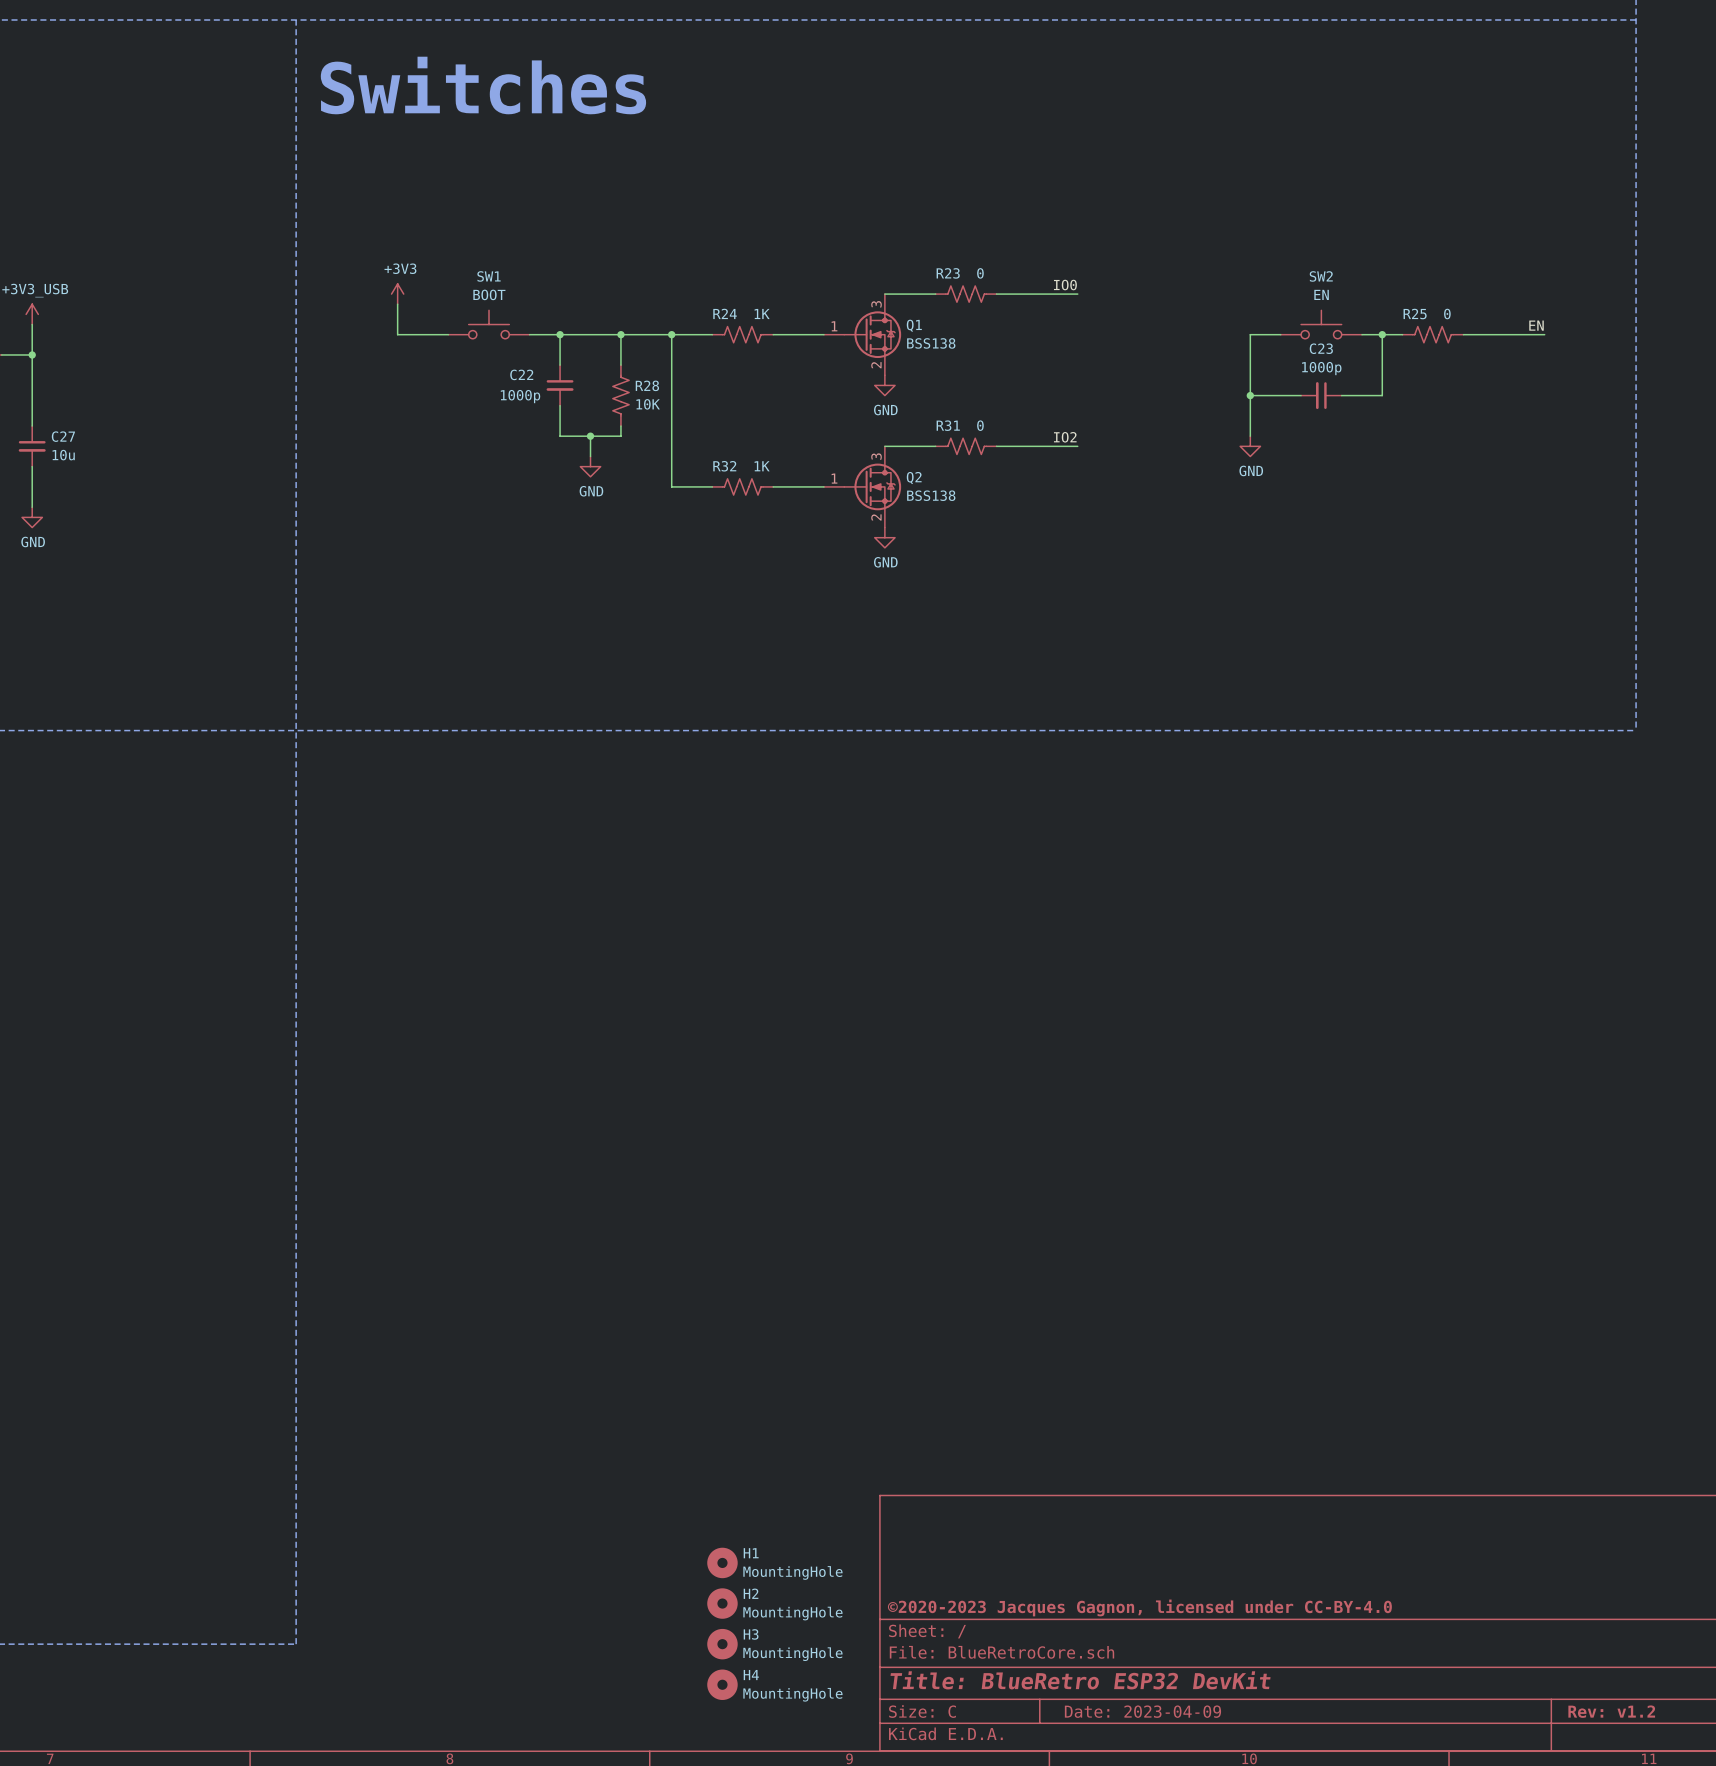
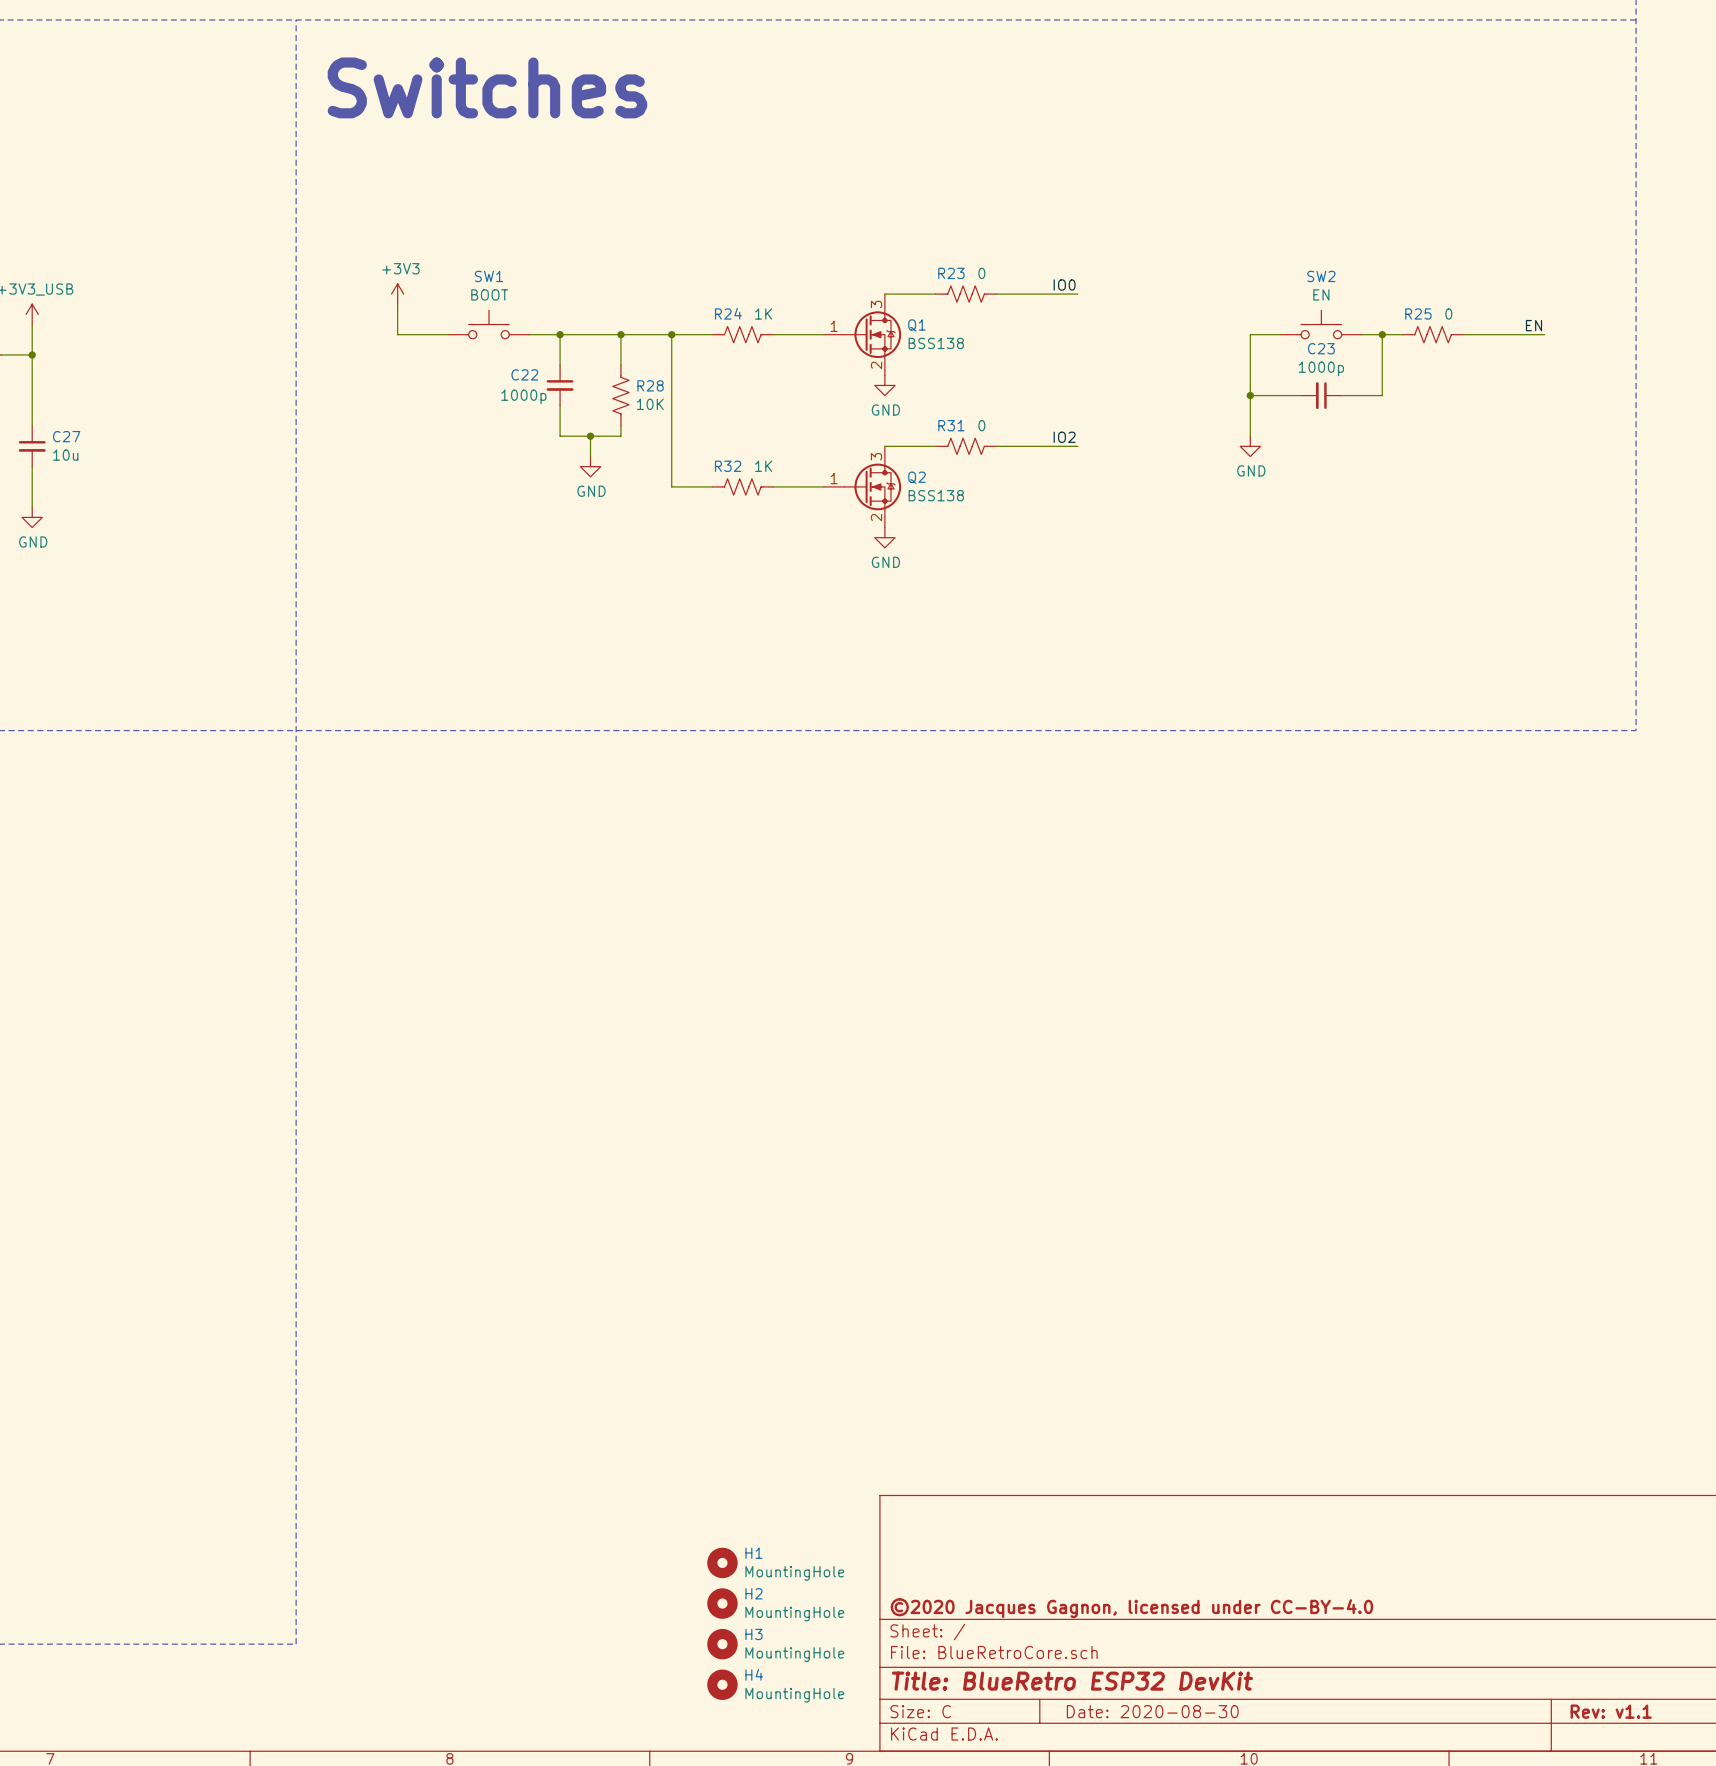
title block: ©2020-2023 Jacques Gagnon, licensed under CC-BY-4.0 (1139, 1607) -> ©2020 Jacques Gagnon, licensed under CC-BY-4.0 (1131, 1608)
title block: Date: 2023-04-09 (1142, 1711) -> Date: 2020-08-30 (1152, 1711)
title block: Rev: v1.2 (1611, 1711) -> Rev: v1.1 (1611, 1711)

